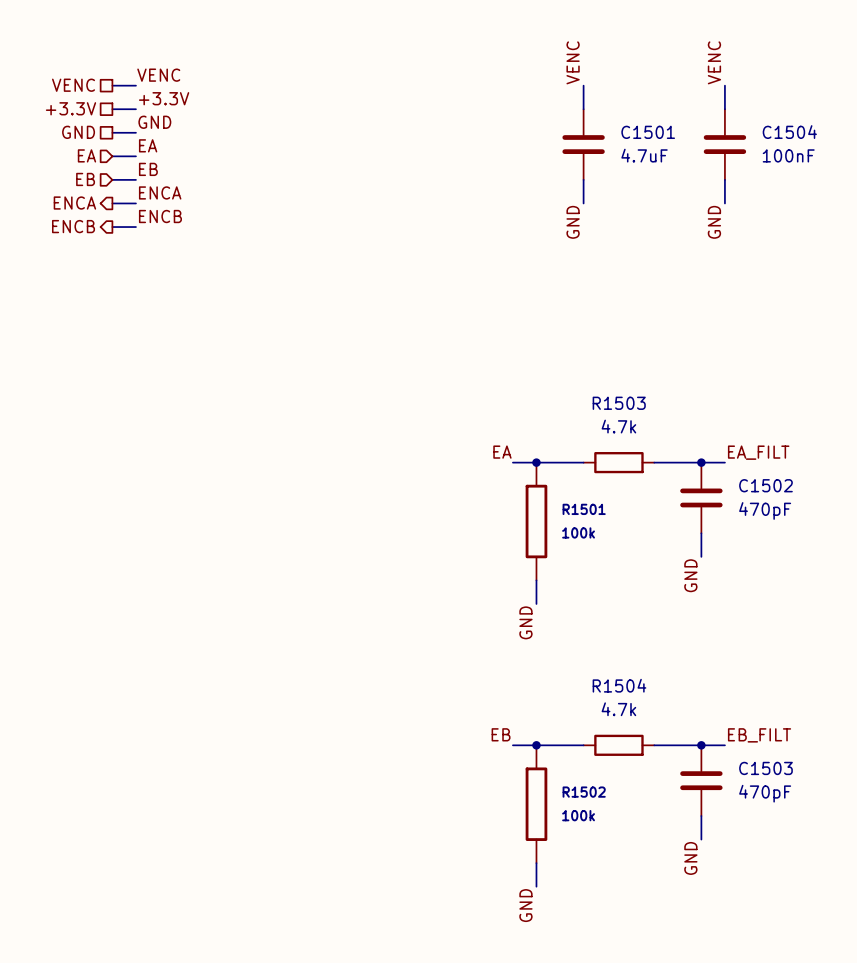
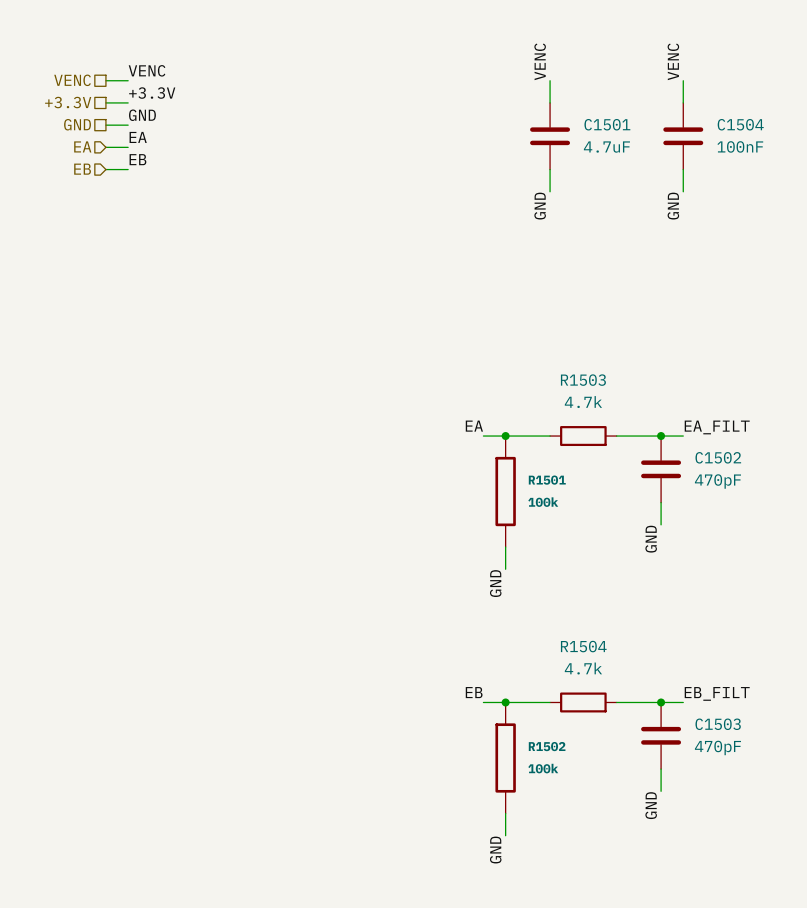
label: ENCA (160, 192) -> none
hierarchical label: ENCA (74, 203) -> none
wire: (112, 203) (135, 203) -> none
label: ENCB (160, 216) -> none
hierarchical label: ENCB (73, 226) -> none
wire: (112, 227) (135, 227) -> none

